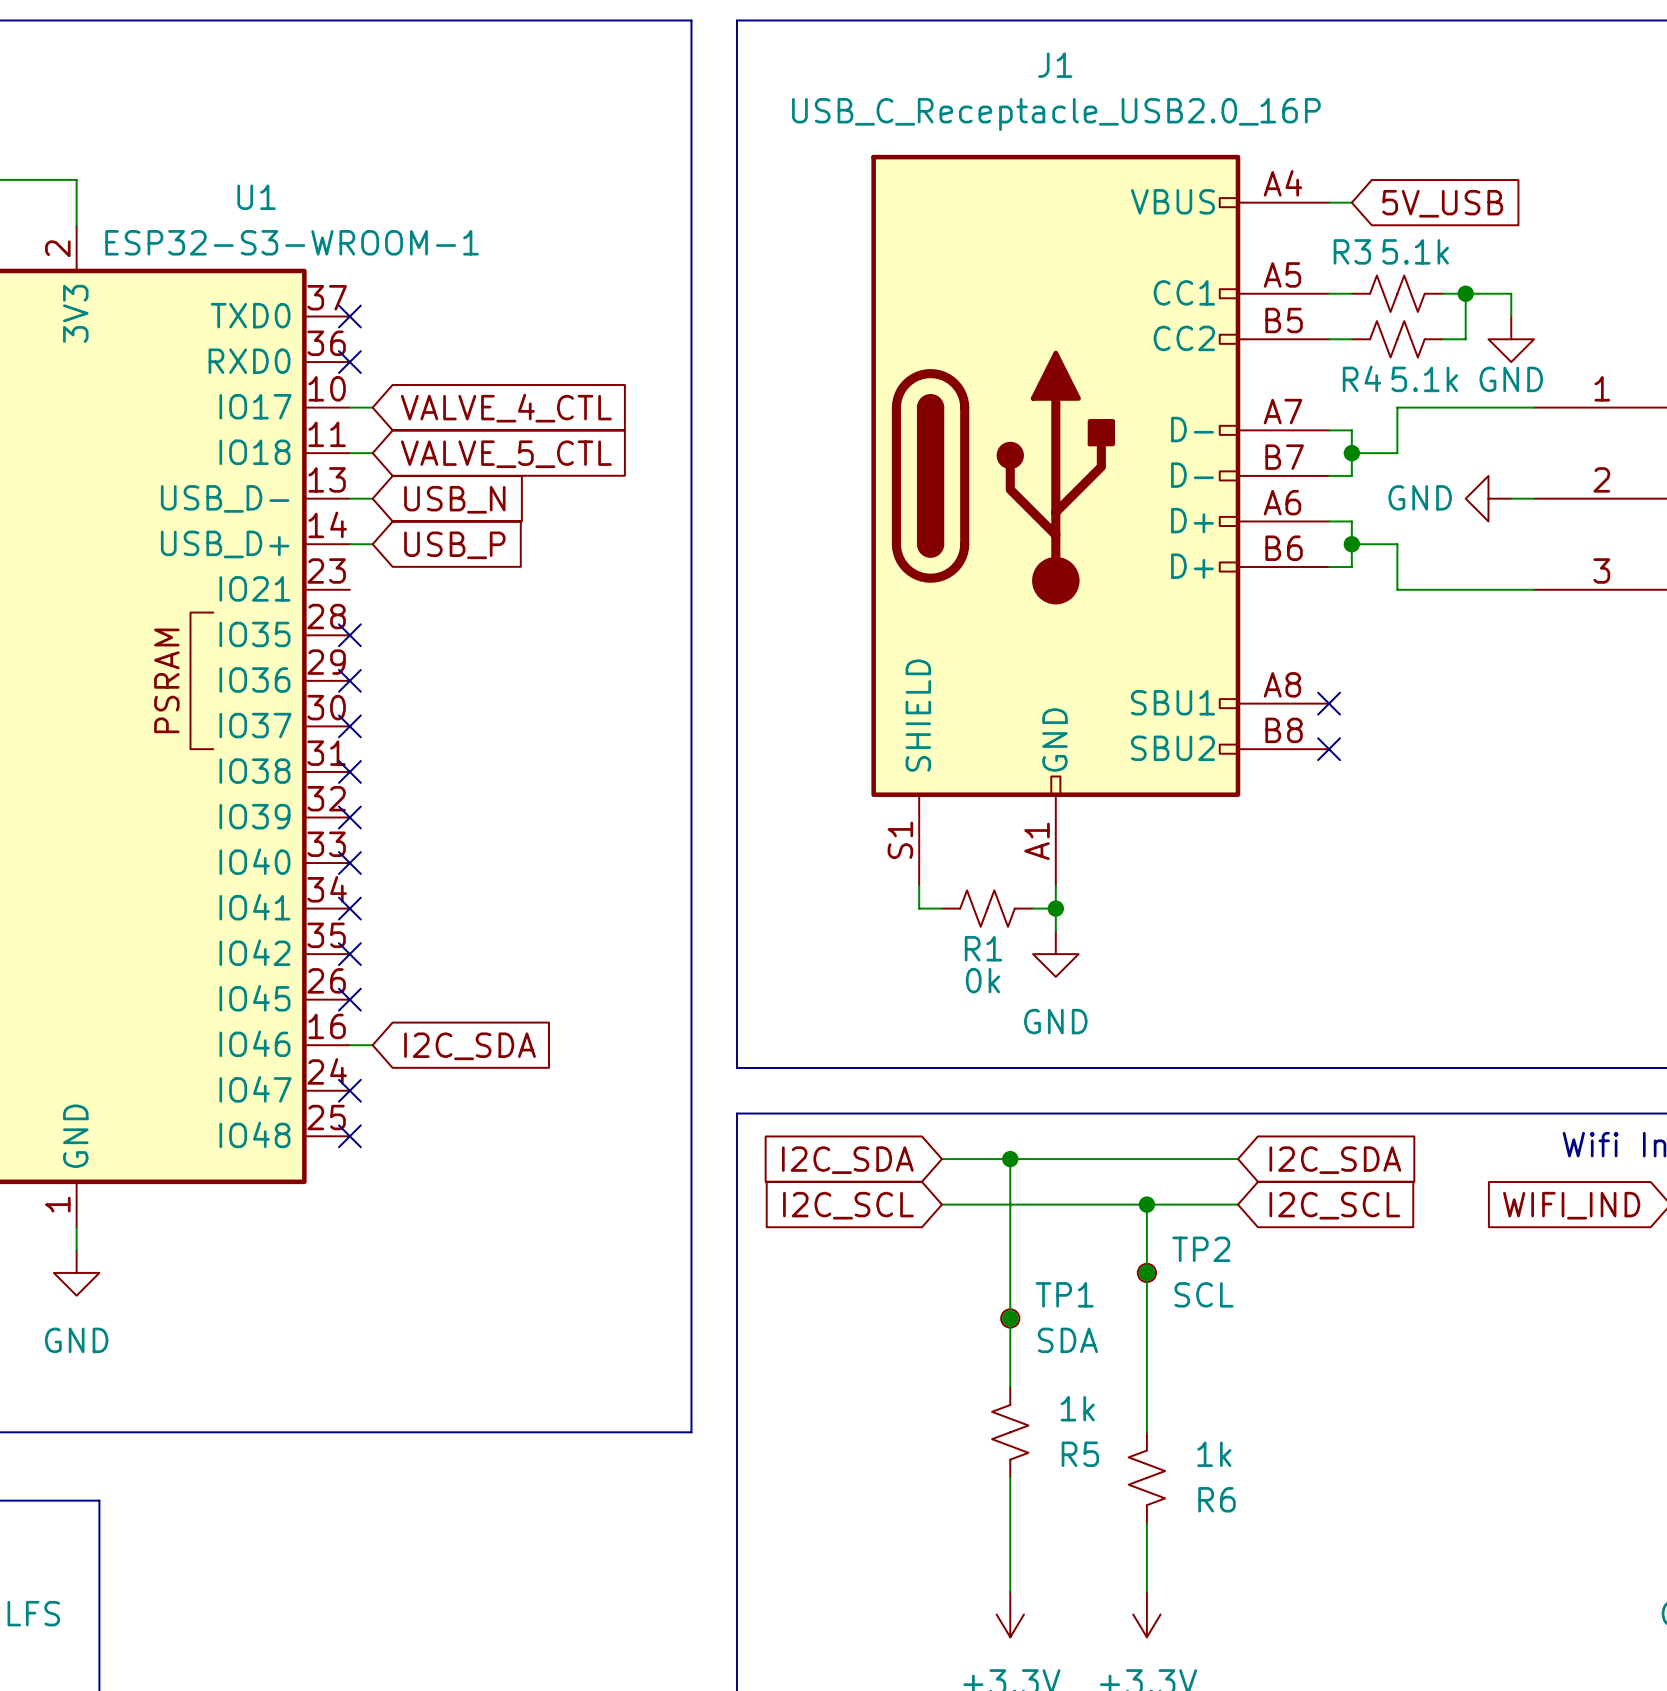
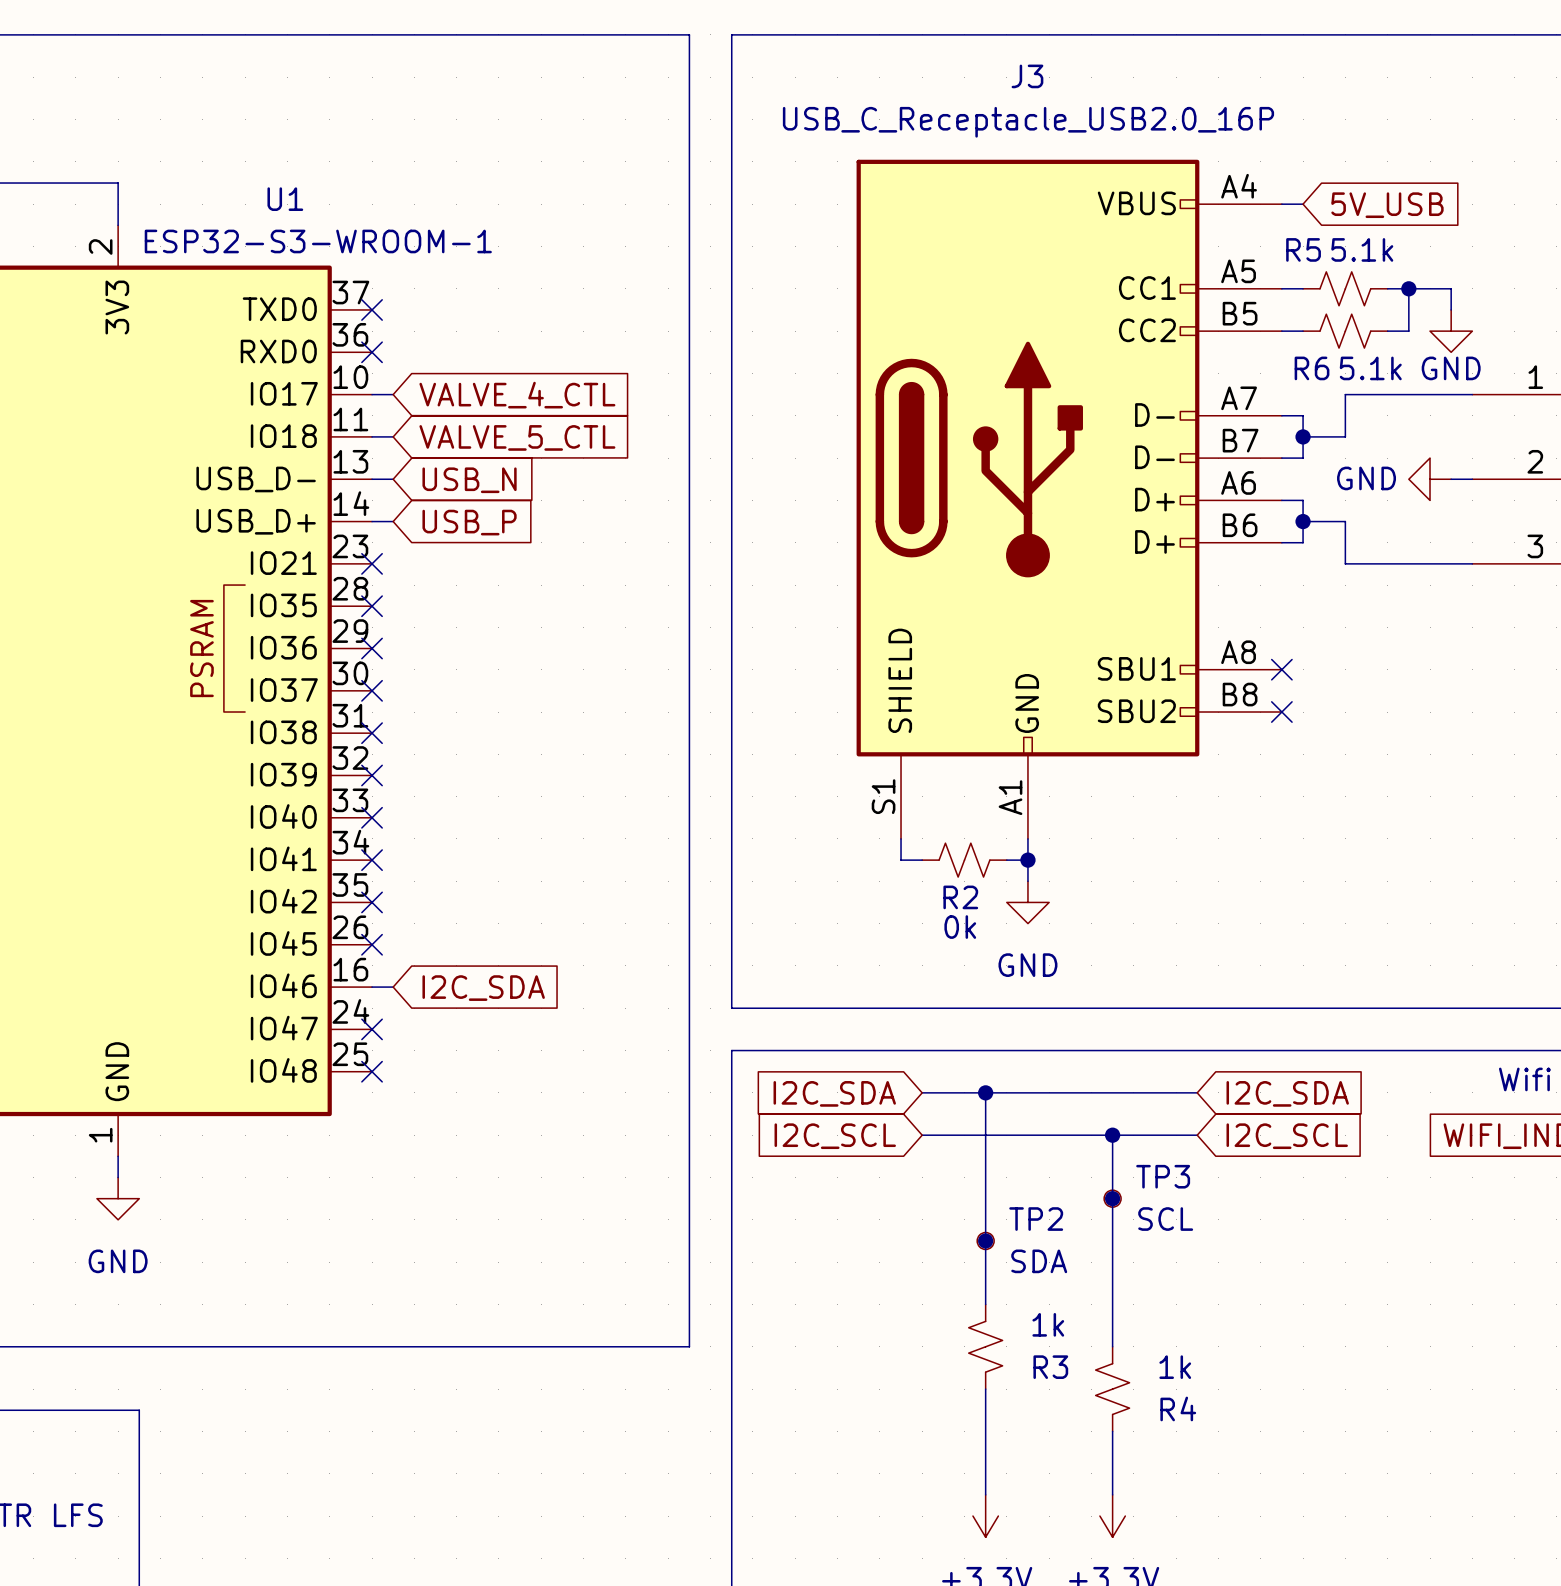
J1 name: J1 (1055, 65) -> J3 (1027, 76)
R3 name: R3 (1352, 251) -> R5 (1303, 249)
R4 name: R4 (1362, 378) -> R6 (1312, 368)
no-connect mark: none -> (372, 563)
R1 name: R1 (983, 948) -> R2 (960, 897)
TP2 name: TP2 (1201, 1249) -> TP3 (1163, 1176)
TP1 name: TP1 (1064, 1294) -> TP2 (1036, 1219)
R5 name: R5 (1080, 1454) -> R3 (1050, 1367)
R6 name: R6 (1217, 1499) -> R4 (1178, 1408)

